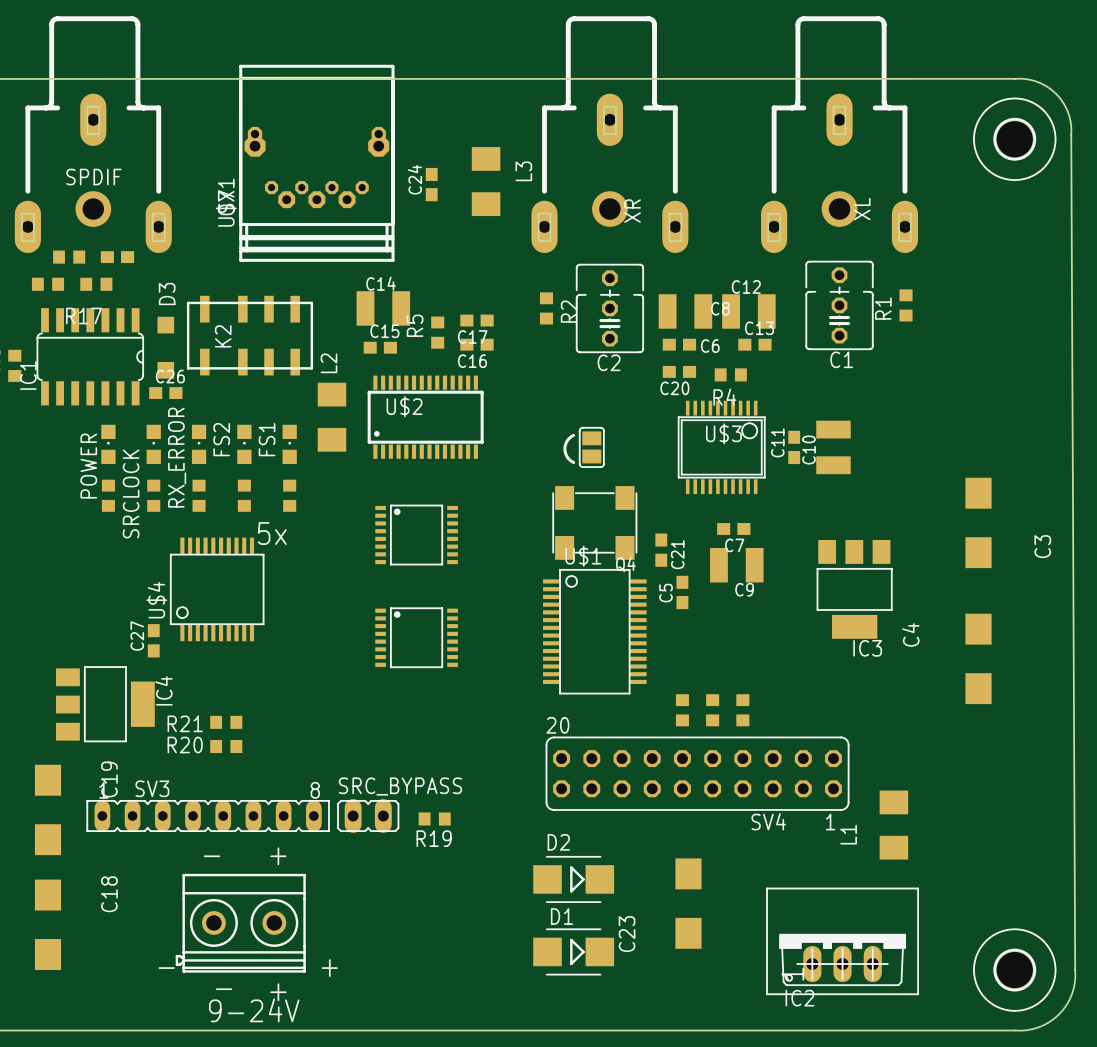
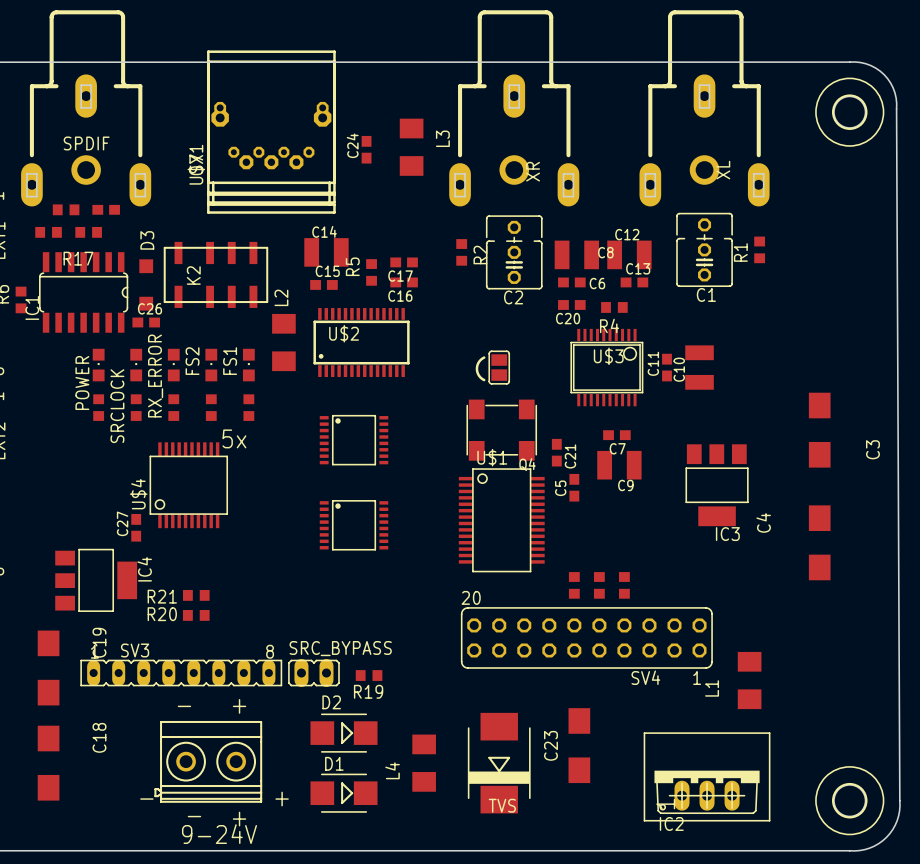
D2 position: (573, 879) -> (344, 733)
L4: none -> (424, 763)
TVS: none -> (499, 763)
C23 name position: C23 (627, 934) -> C23 (550, 745)
D1 position: (573, 951) -> (344, 793)

